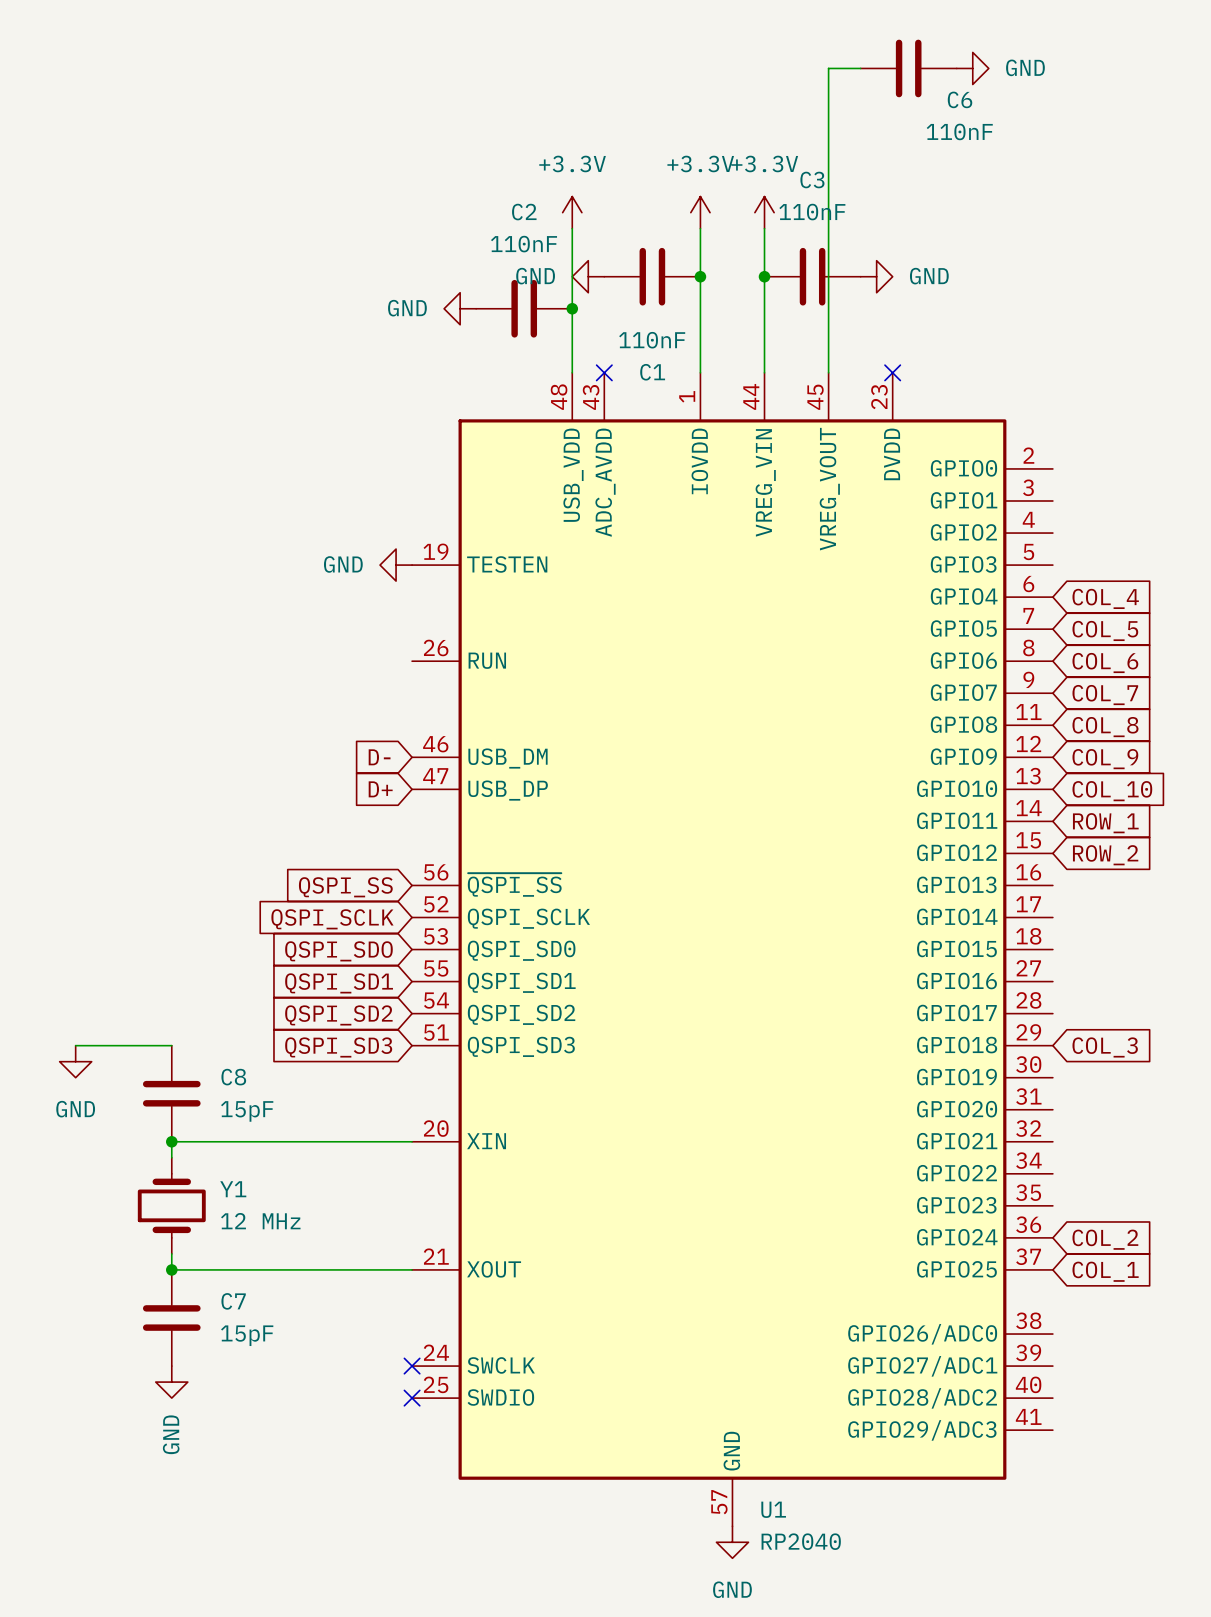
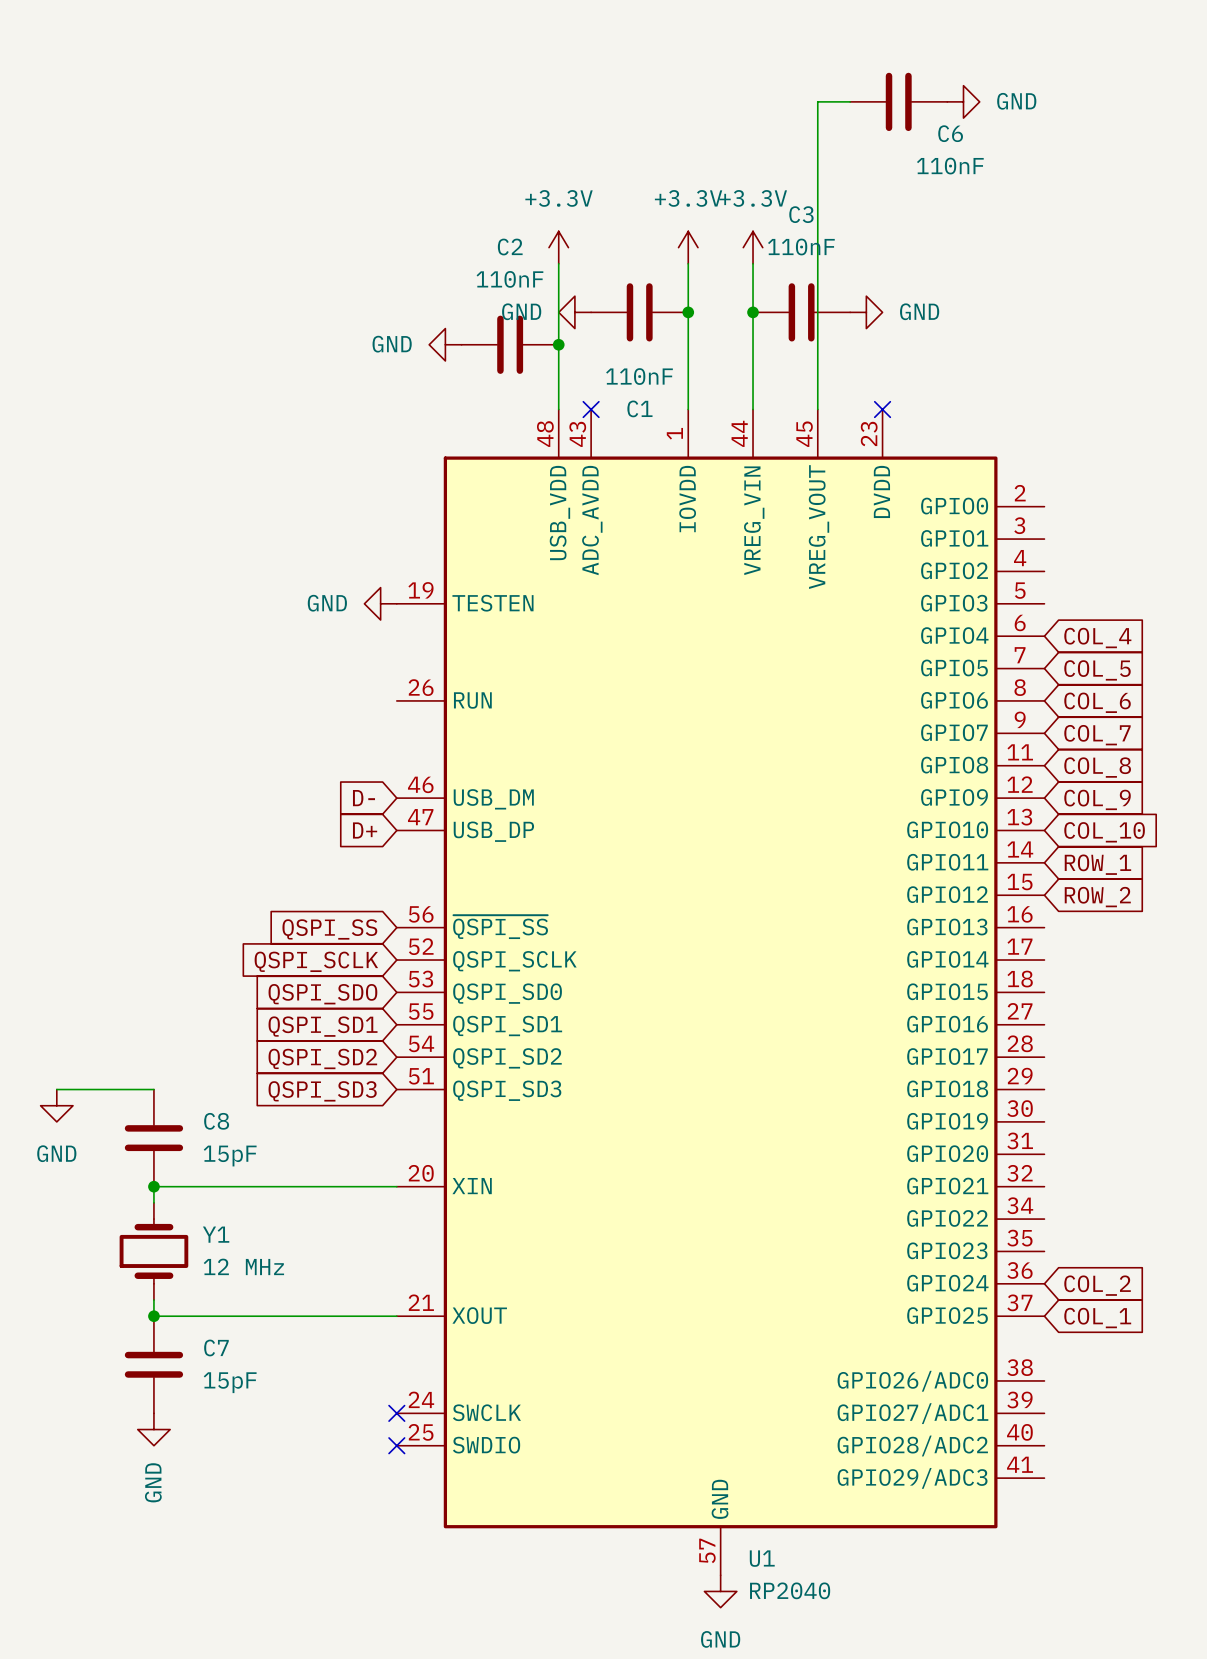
global label: COL_3 (1105, 1047) -> none

